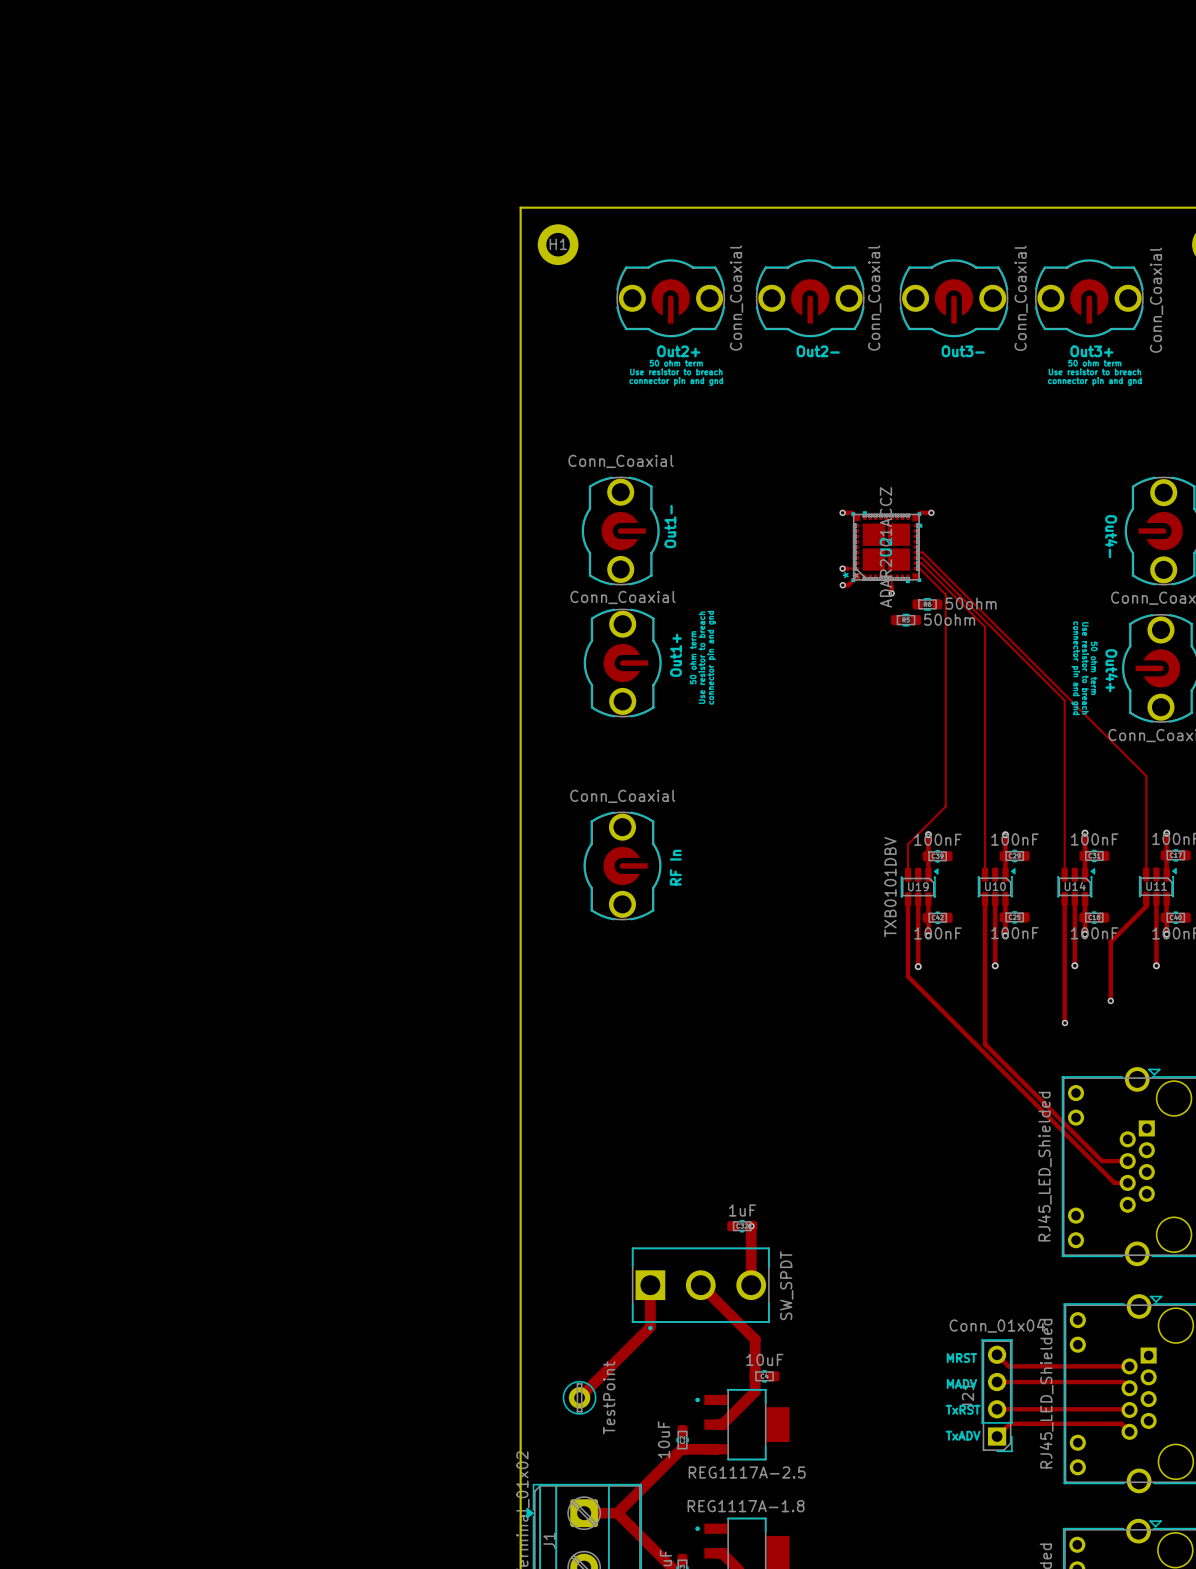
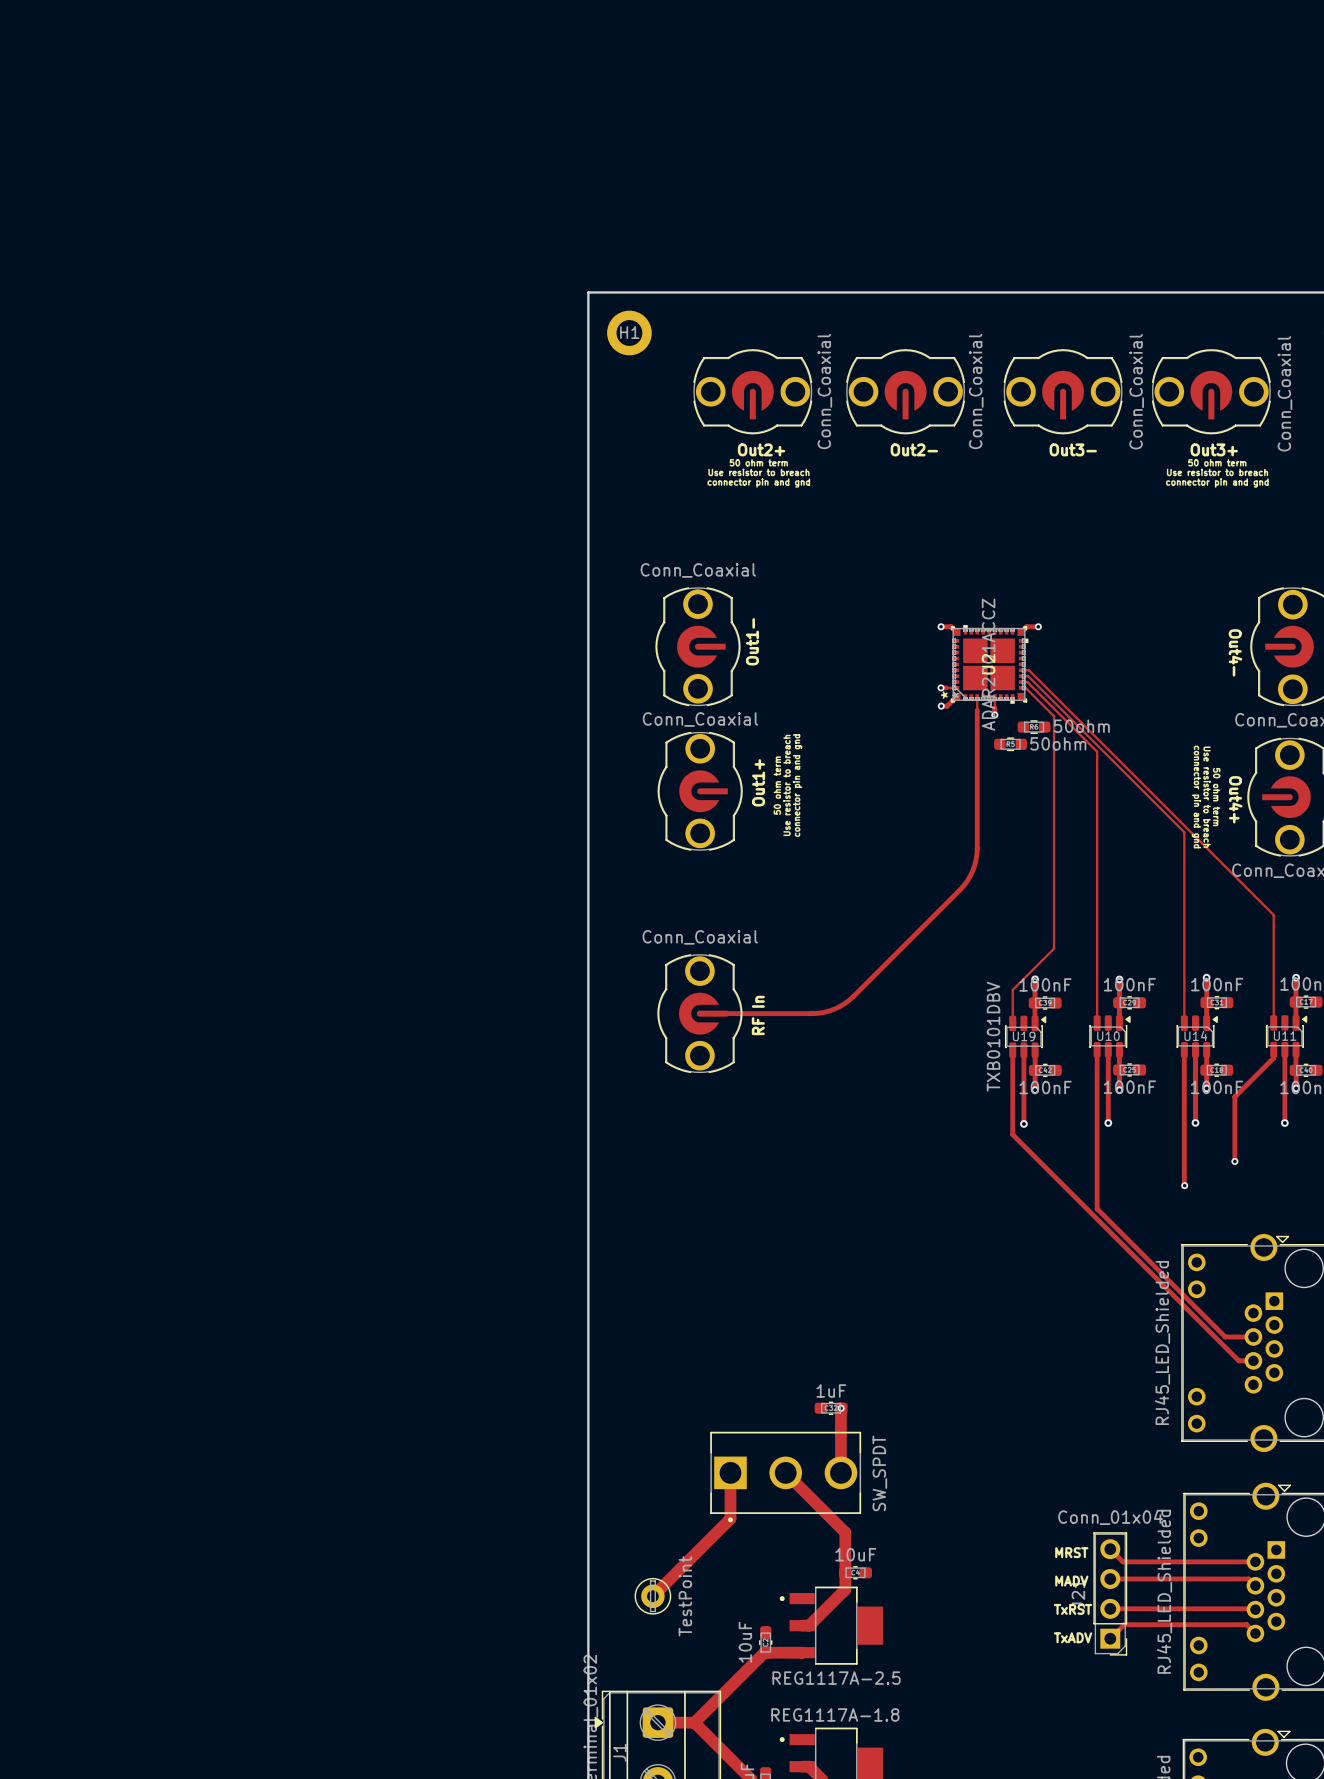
track: none -> (977, 696) (976, 854) (972, 870) (963, 885) (853, 996) (839, 1006) (817, 1013) (699, 1013)

